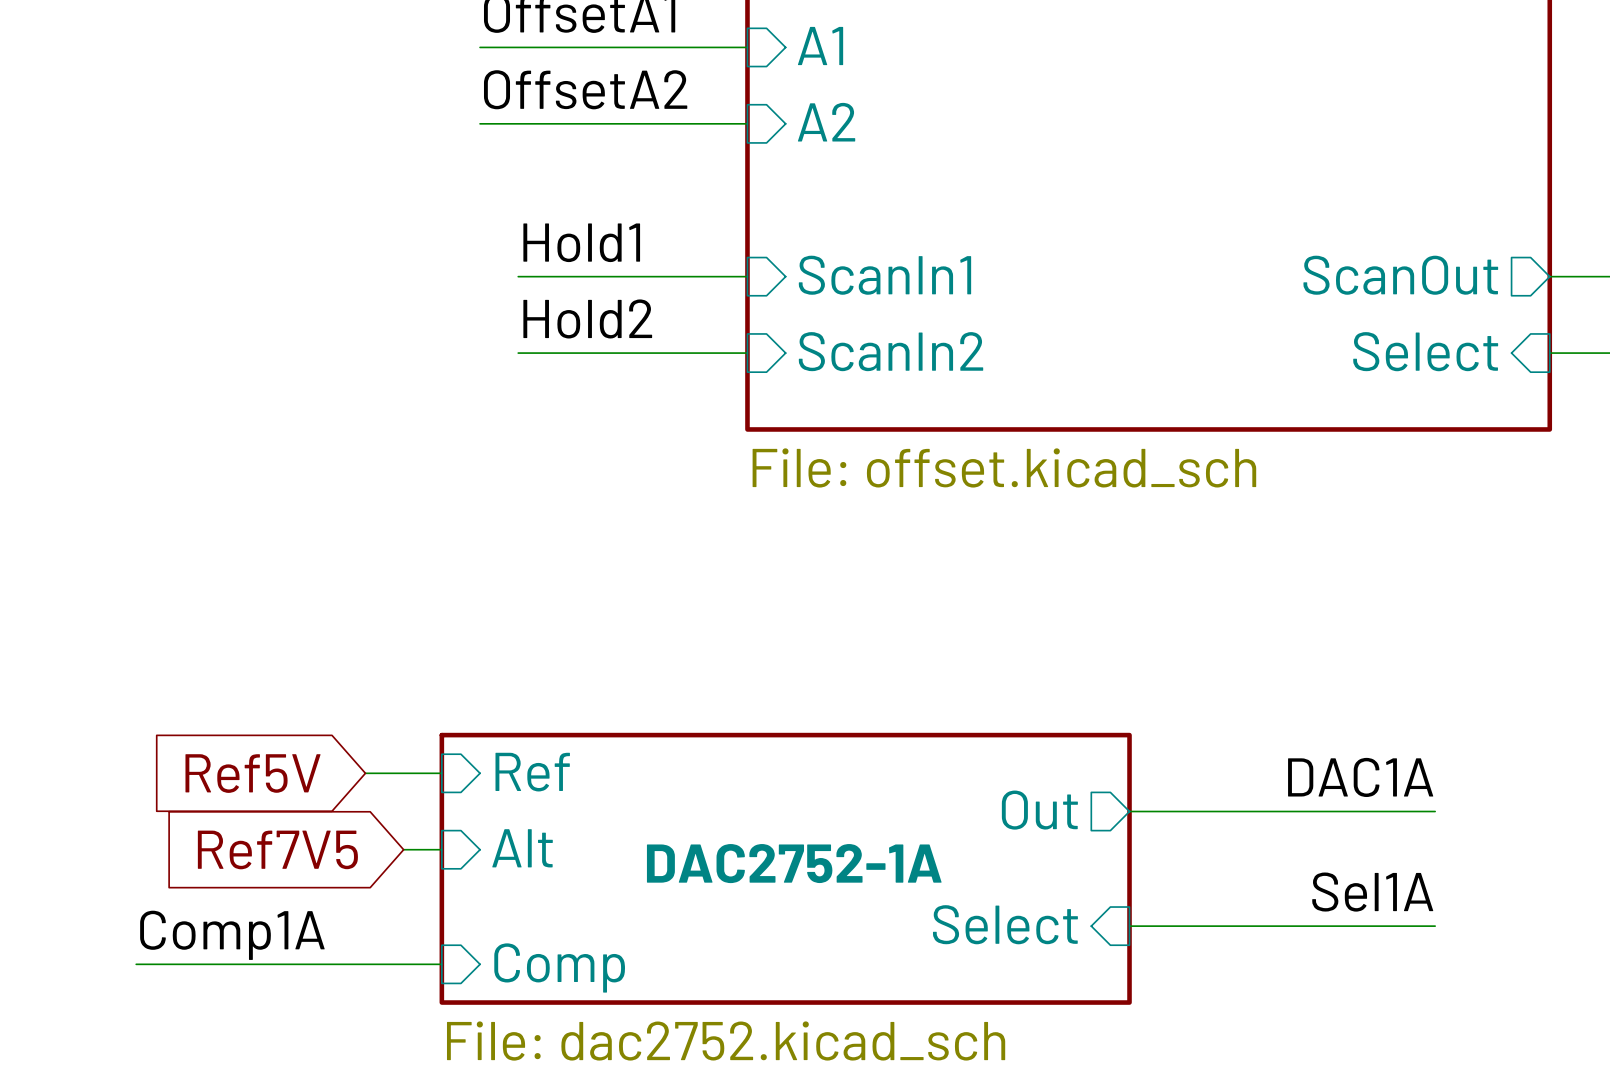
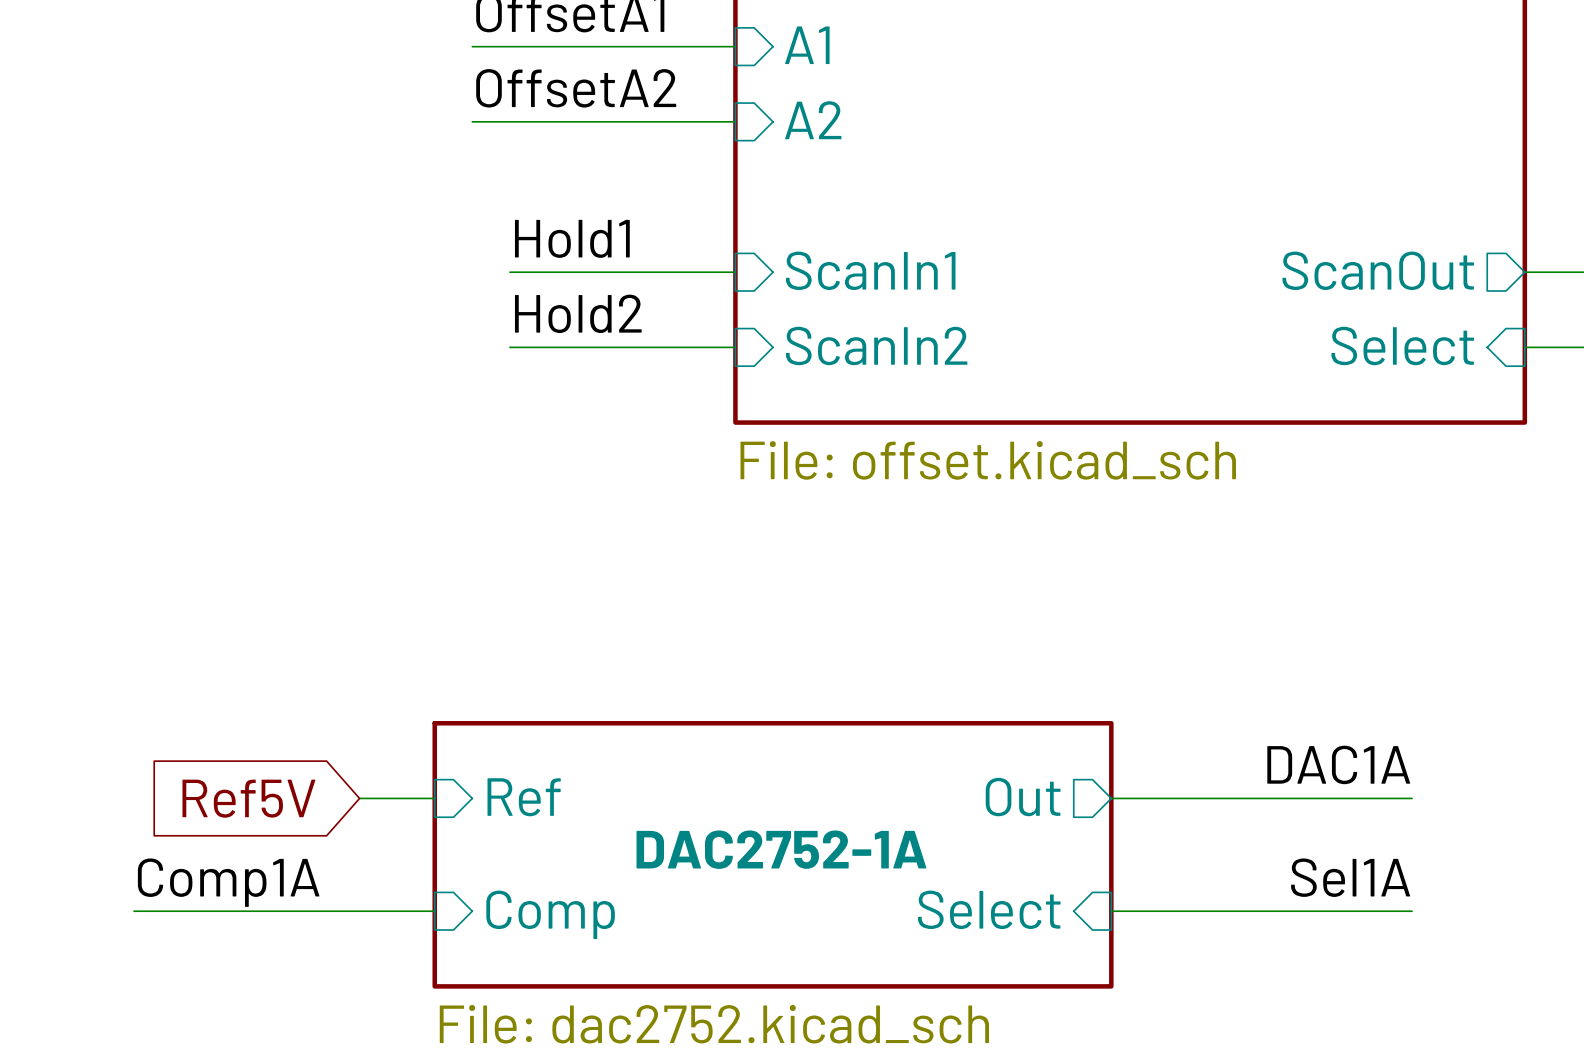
sheet pin position: Ref (532, 772) -> Ref (524, 797)
global label position: Ref5V (253, 773) -> Ref5V (248, 798)
wire: (365, 773) (441, 773) -> (359, 798) (434, 798)
sheet pin: Alt (522, 848) -> none
global label: Ref7V5 (277, 849) -> none
wire: (403, 849) (441, 849) -> none
label position: Comp1A (232, 935) -> Comp1A (228, 882)
wire: (136, 964) (441, 964) -> (134, 911) (434, 911)
sheet pin position: Comp (559, 967) -> Comp (550, 914)

